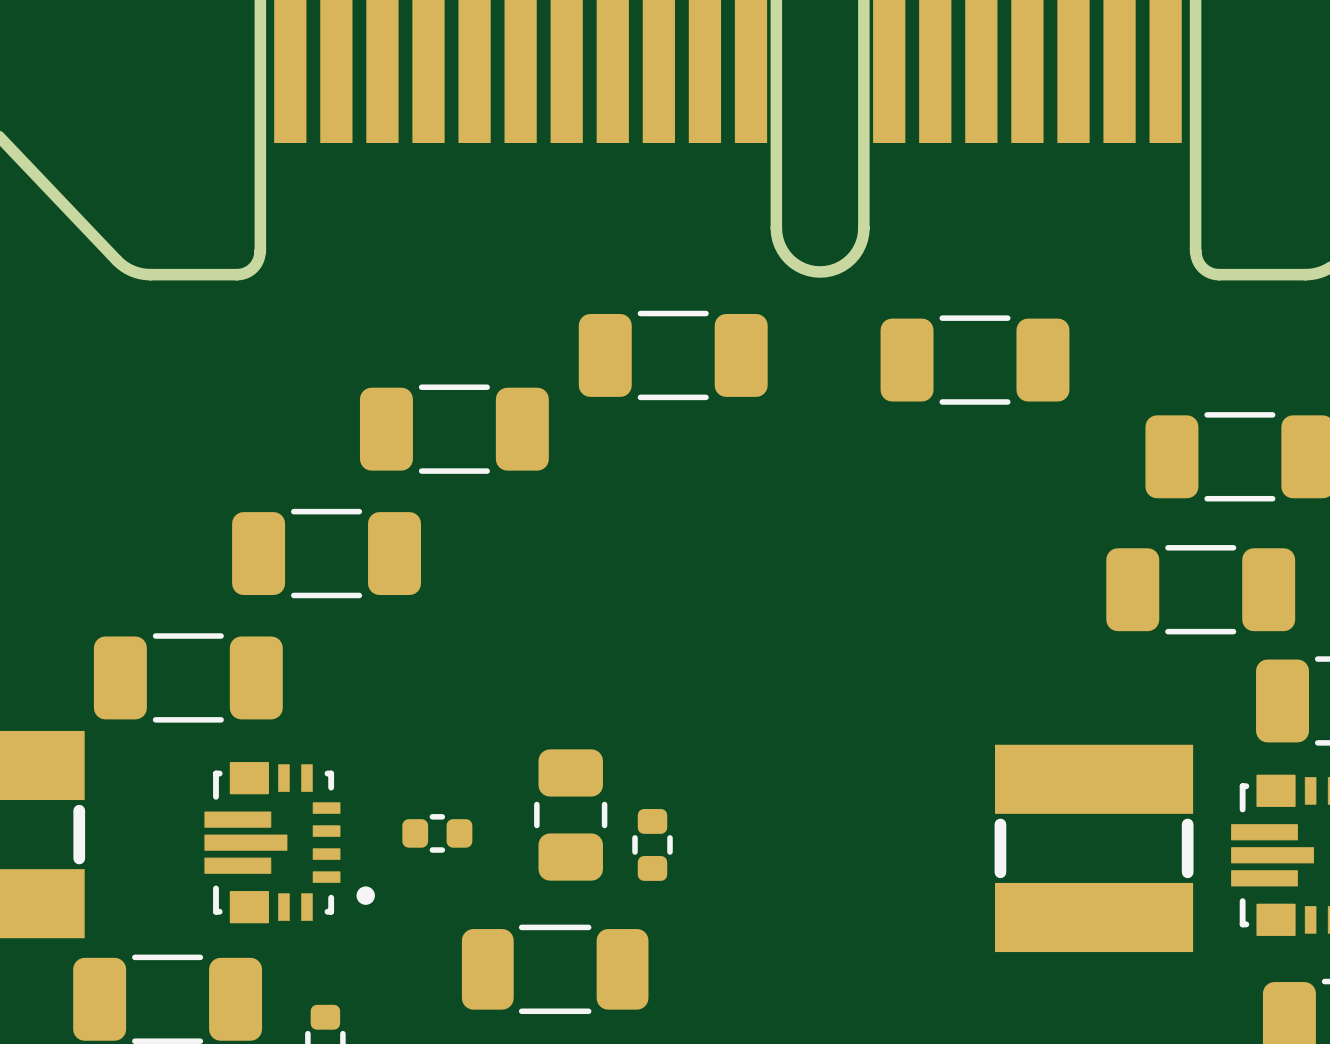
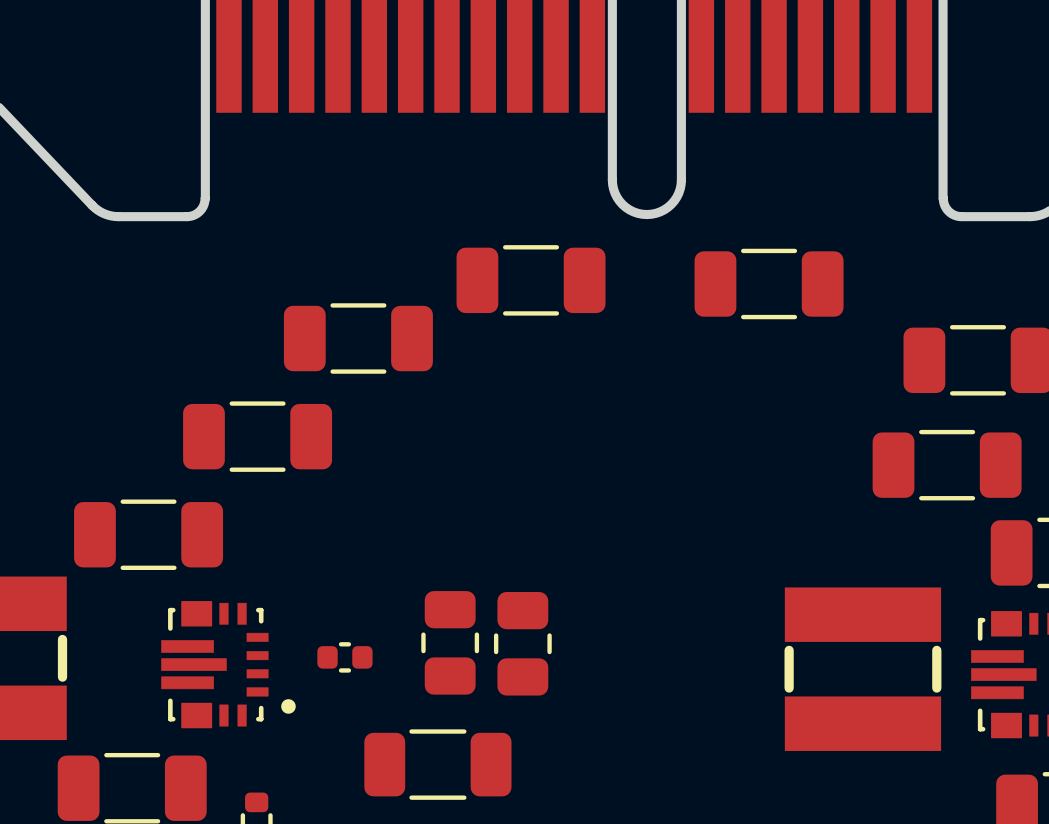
part footprint: [632, 809, 673, 881] -> [493, 591, 552, 696]

